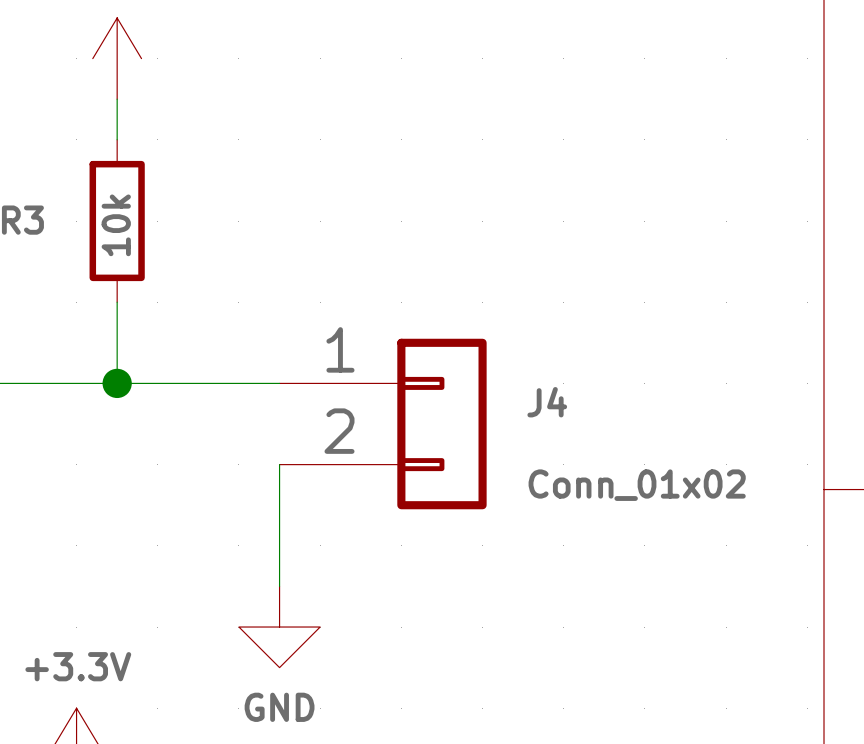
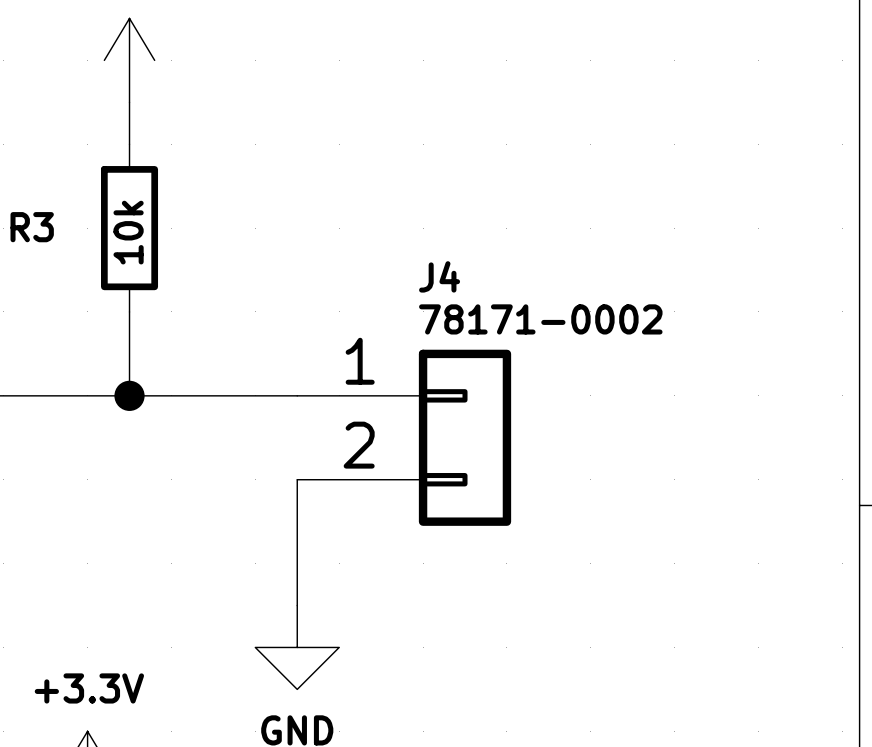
J4 name position: J4 (547, 402) -> J4 (439, 276)
J4 value: Conn_01x02 (637, 485) -> 78171-0002 (540, 319)

